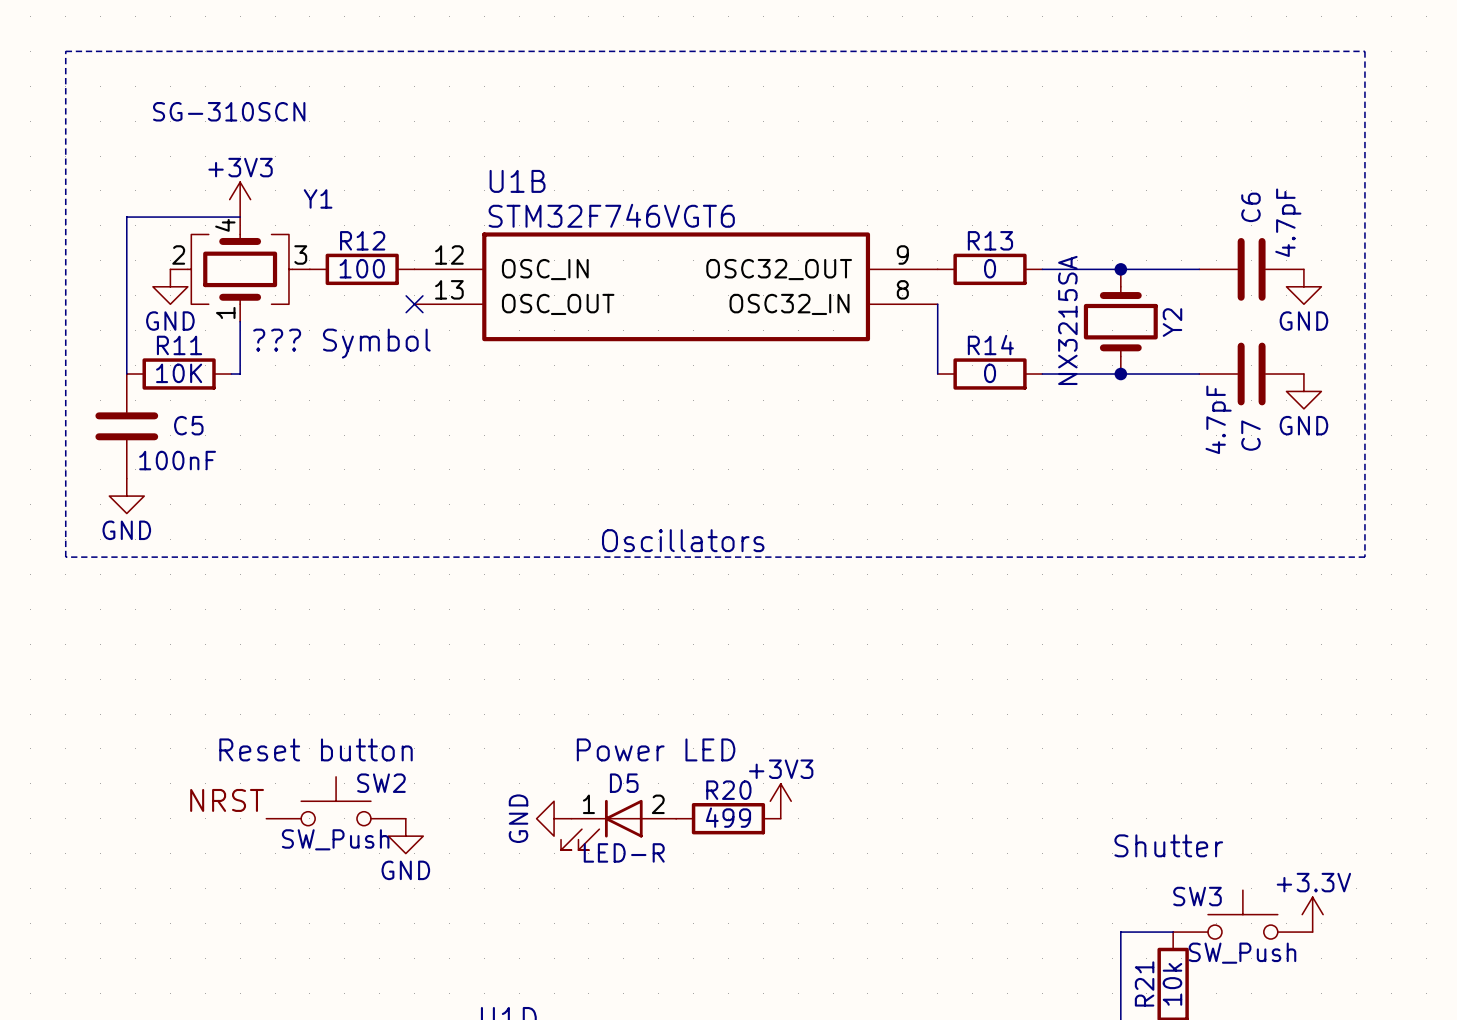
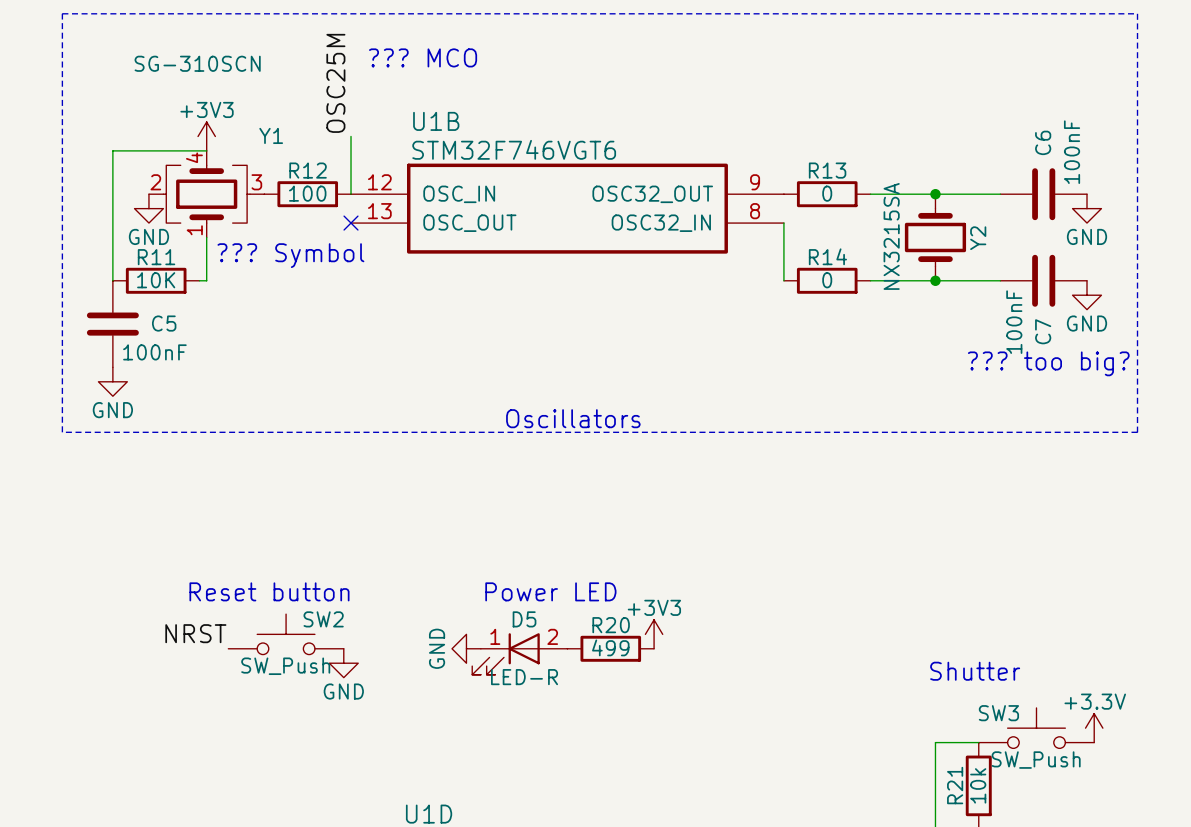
text: none -> ??? MCO (423, 57)
label: none -> OSC25M (335, 83)
wire: none -> (351, 136) (351, 194)
C6 value: 4.7pF (1288, 222) -> 100nF (1072, 152)
C7 value: 4.7pF (1218, 419) -> 100nF (1014, 322)
text: none -> ??? too big? (1048, 363)

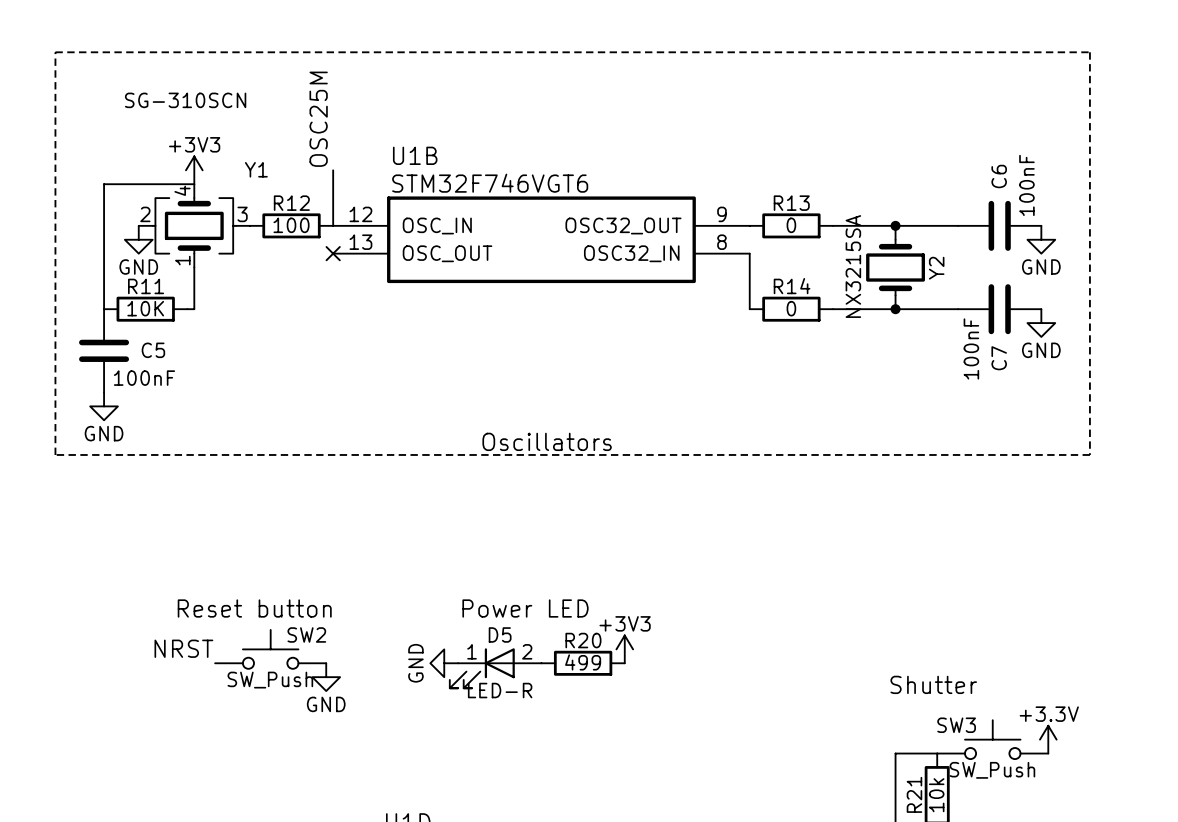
text: ??? MCO (423, 57) -> none
text: ??? Symbol (290, 255) -> none
text: ??? too big? (1048, 363) -> none

